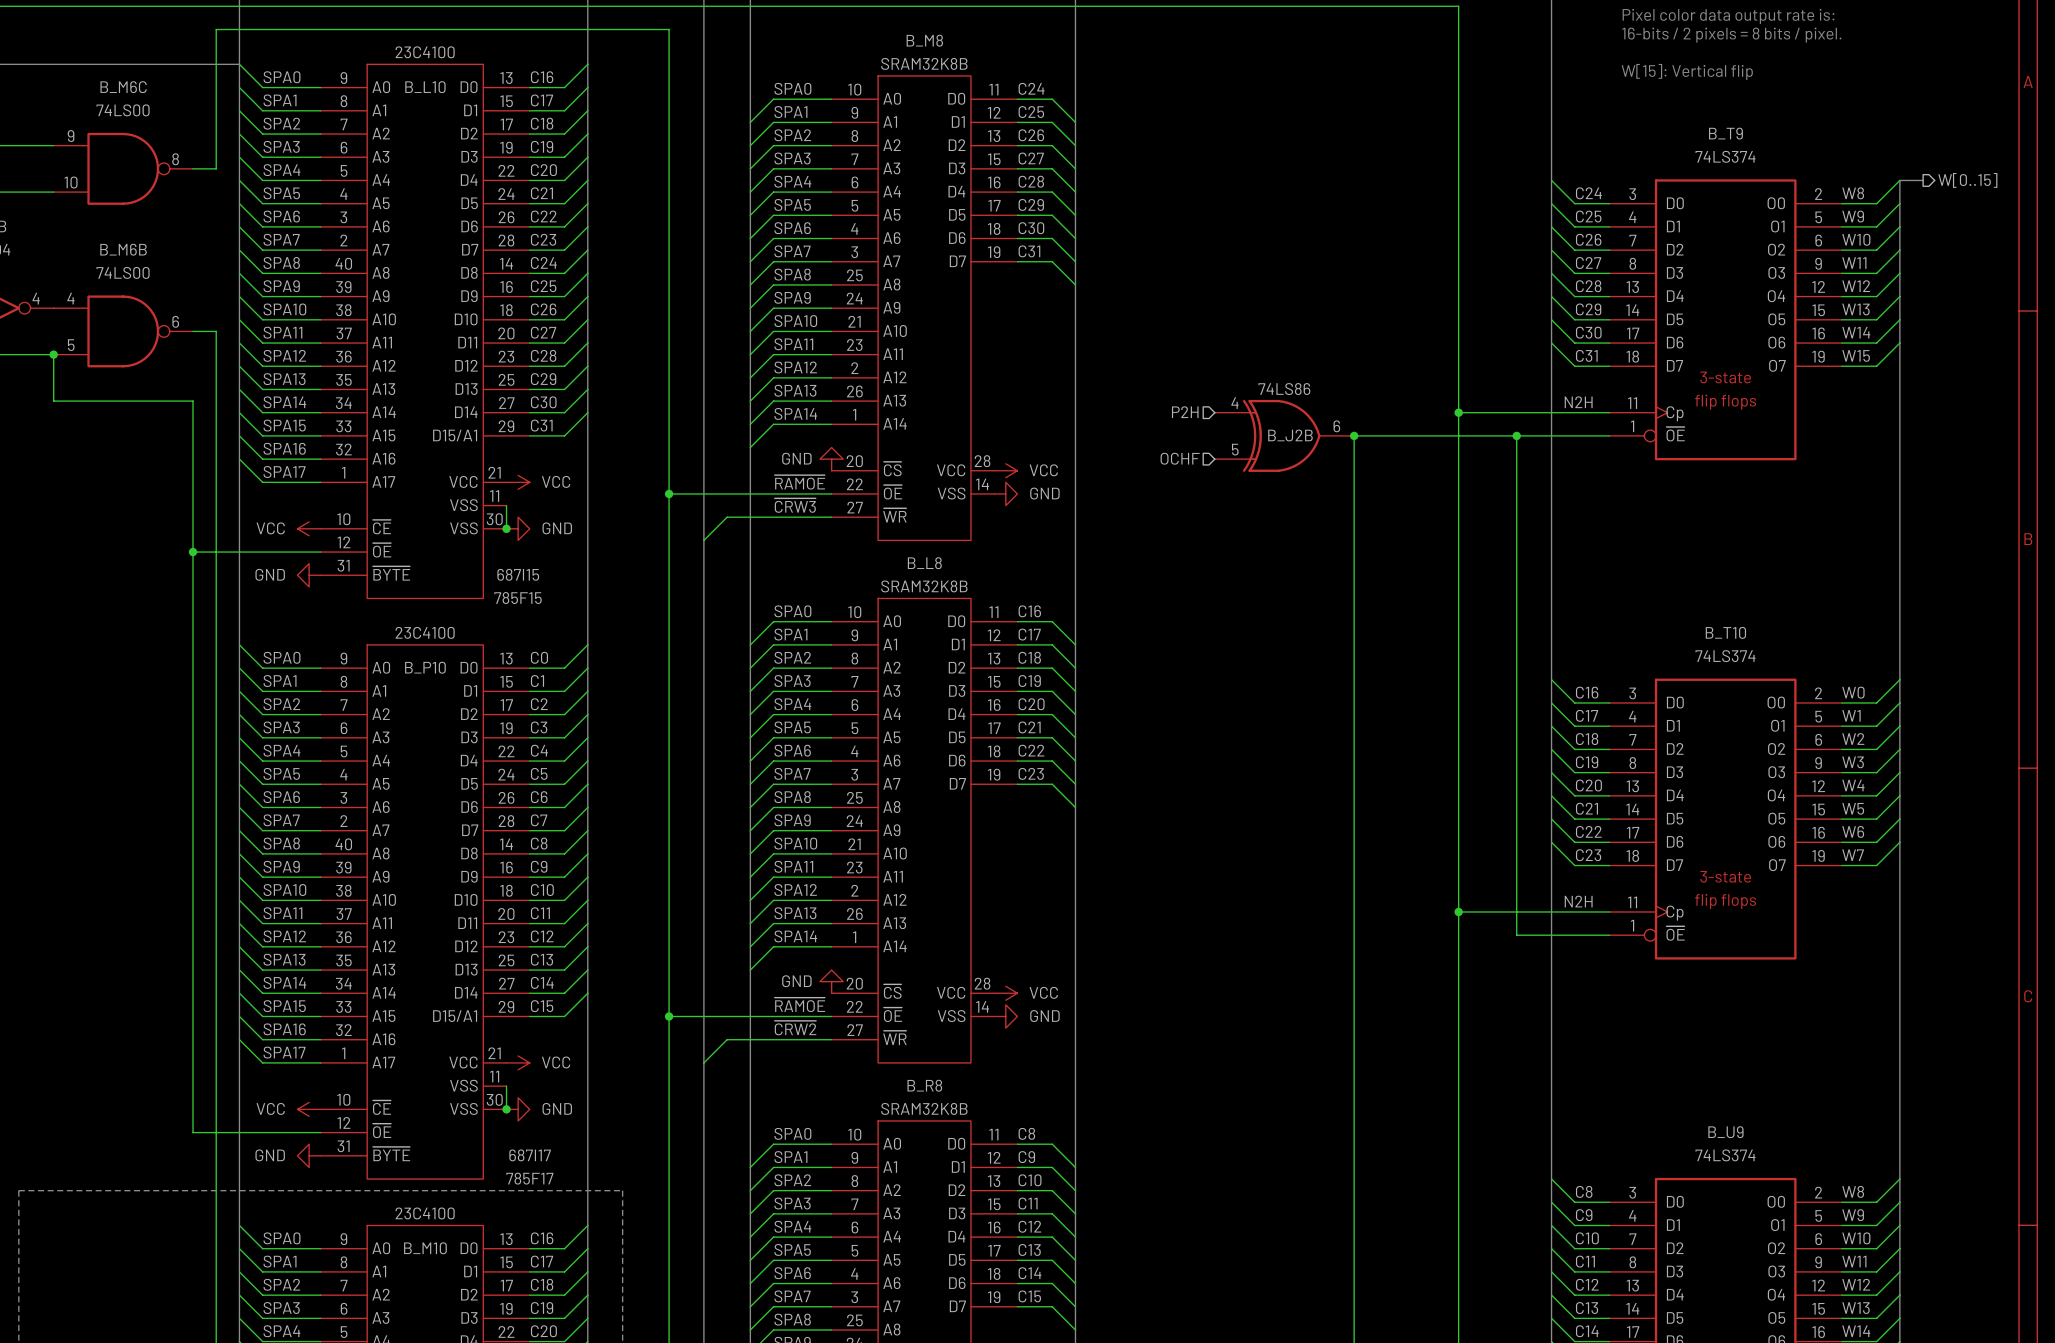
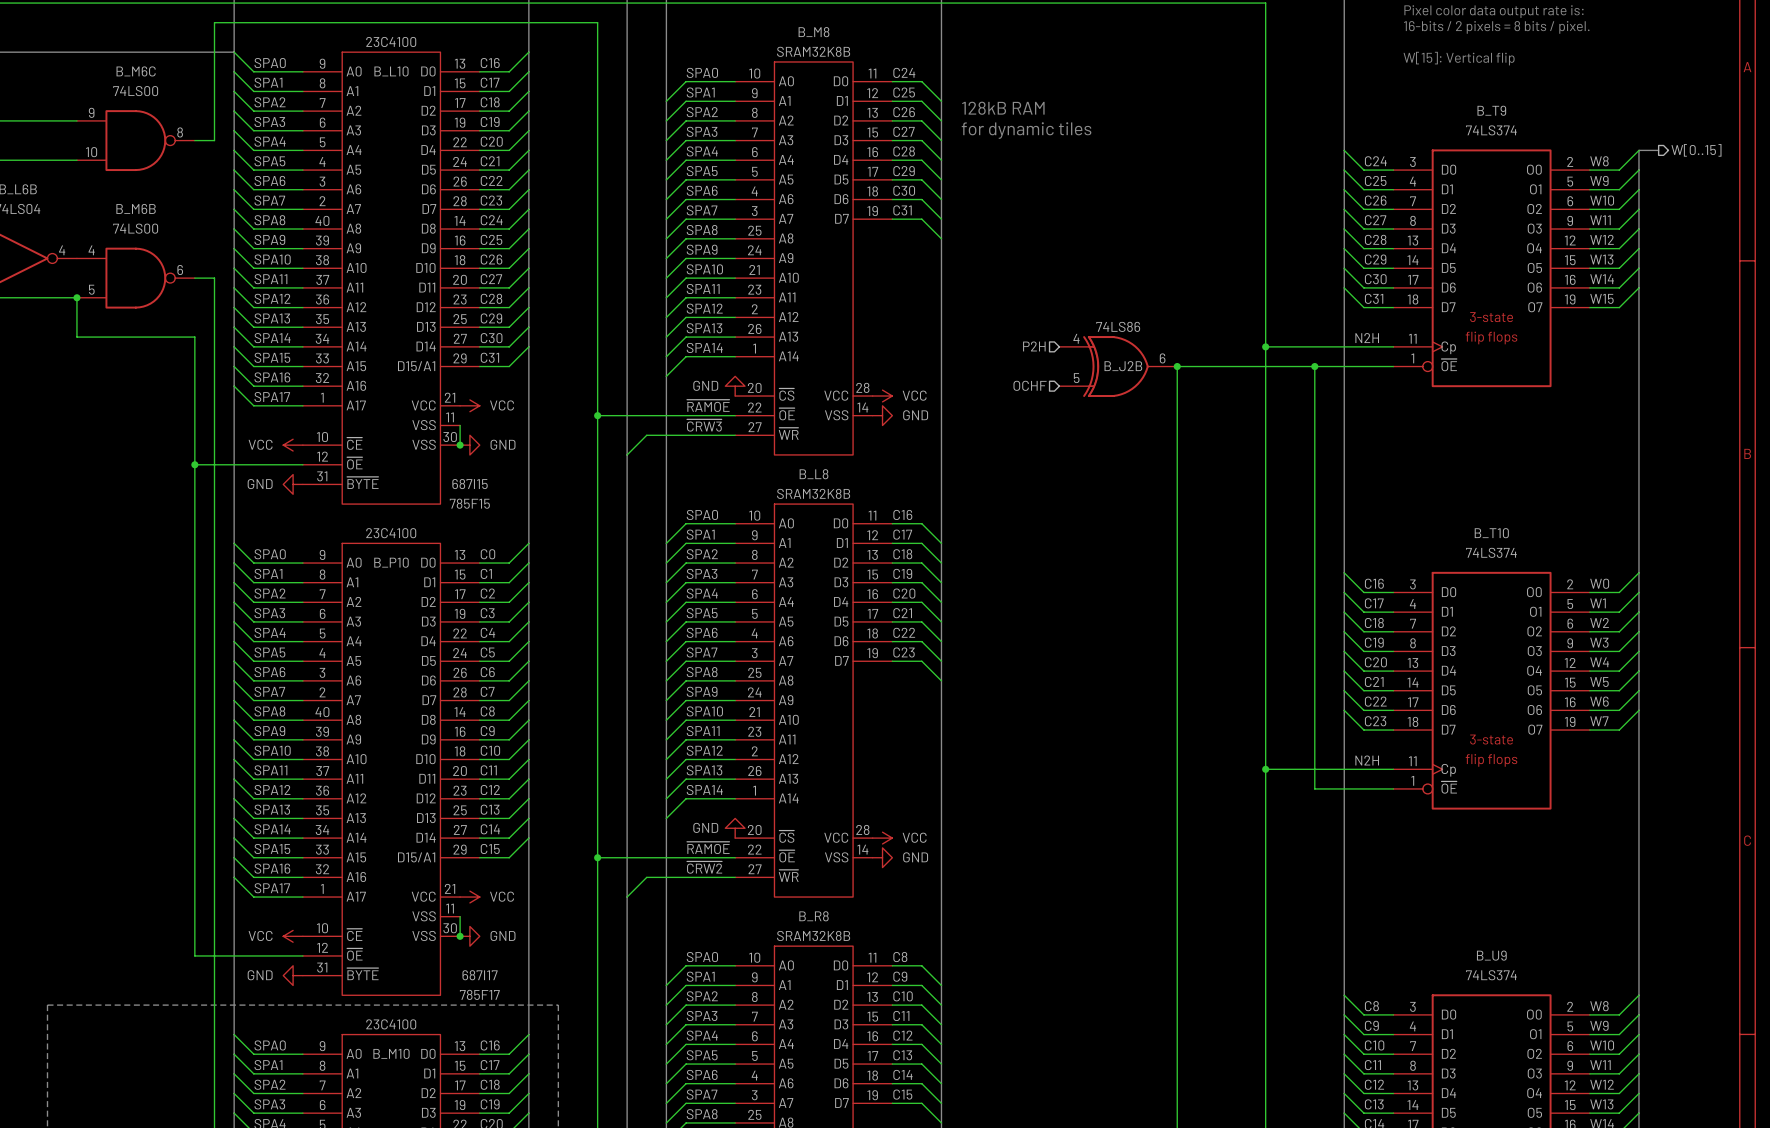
text: none -> 128kB RAM (1003, 108)
text: none -> for dynamic tiles (1026, 130)

